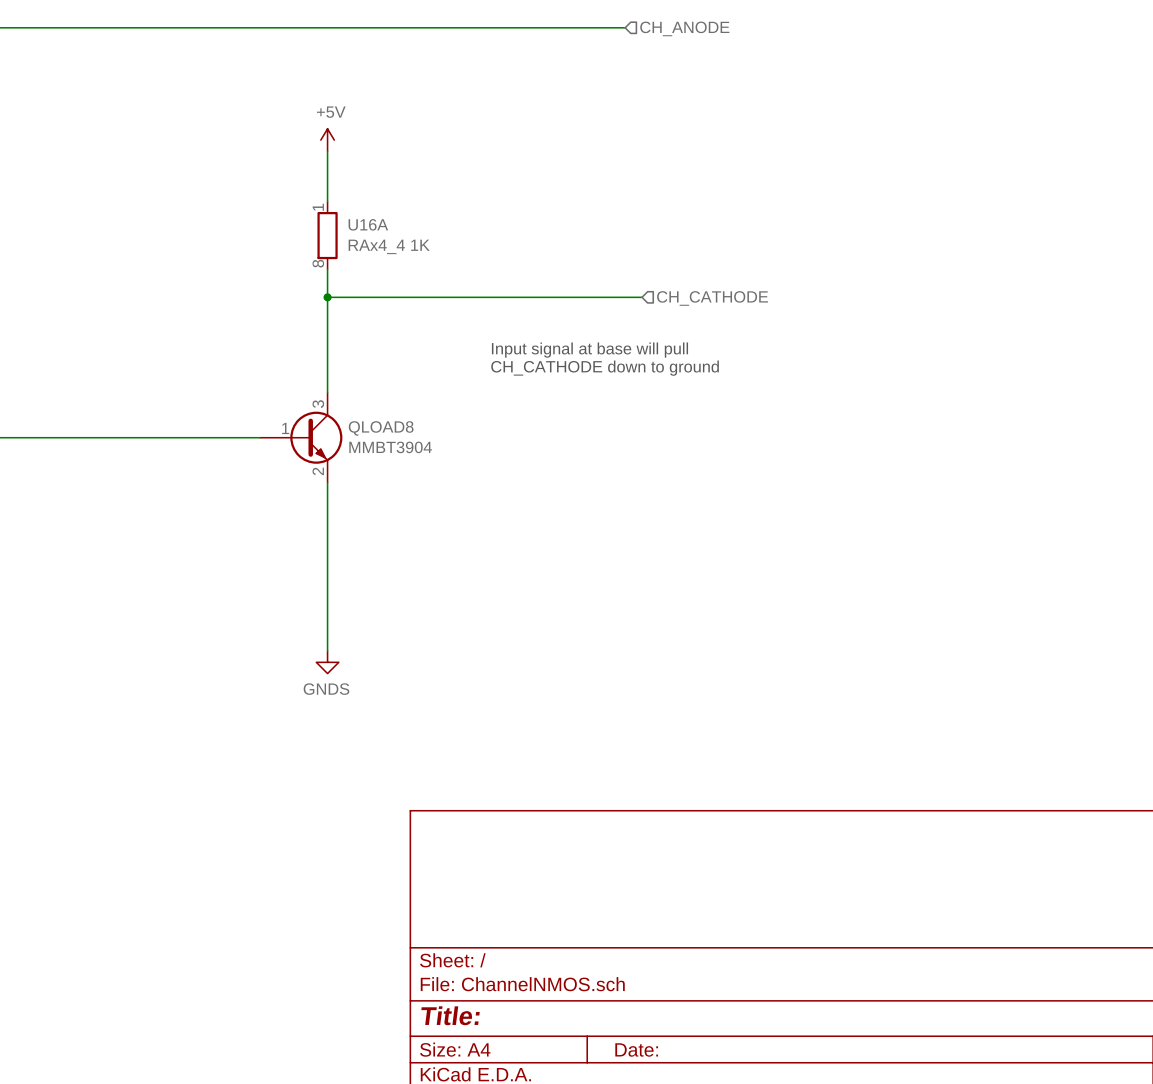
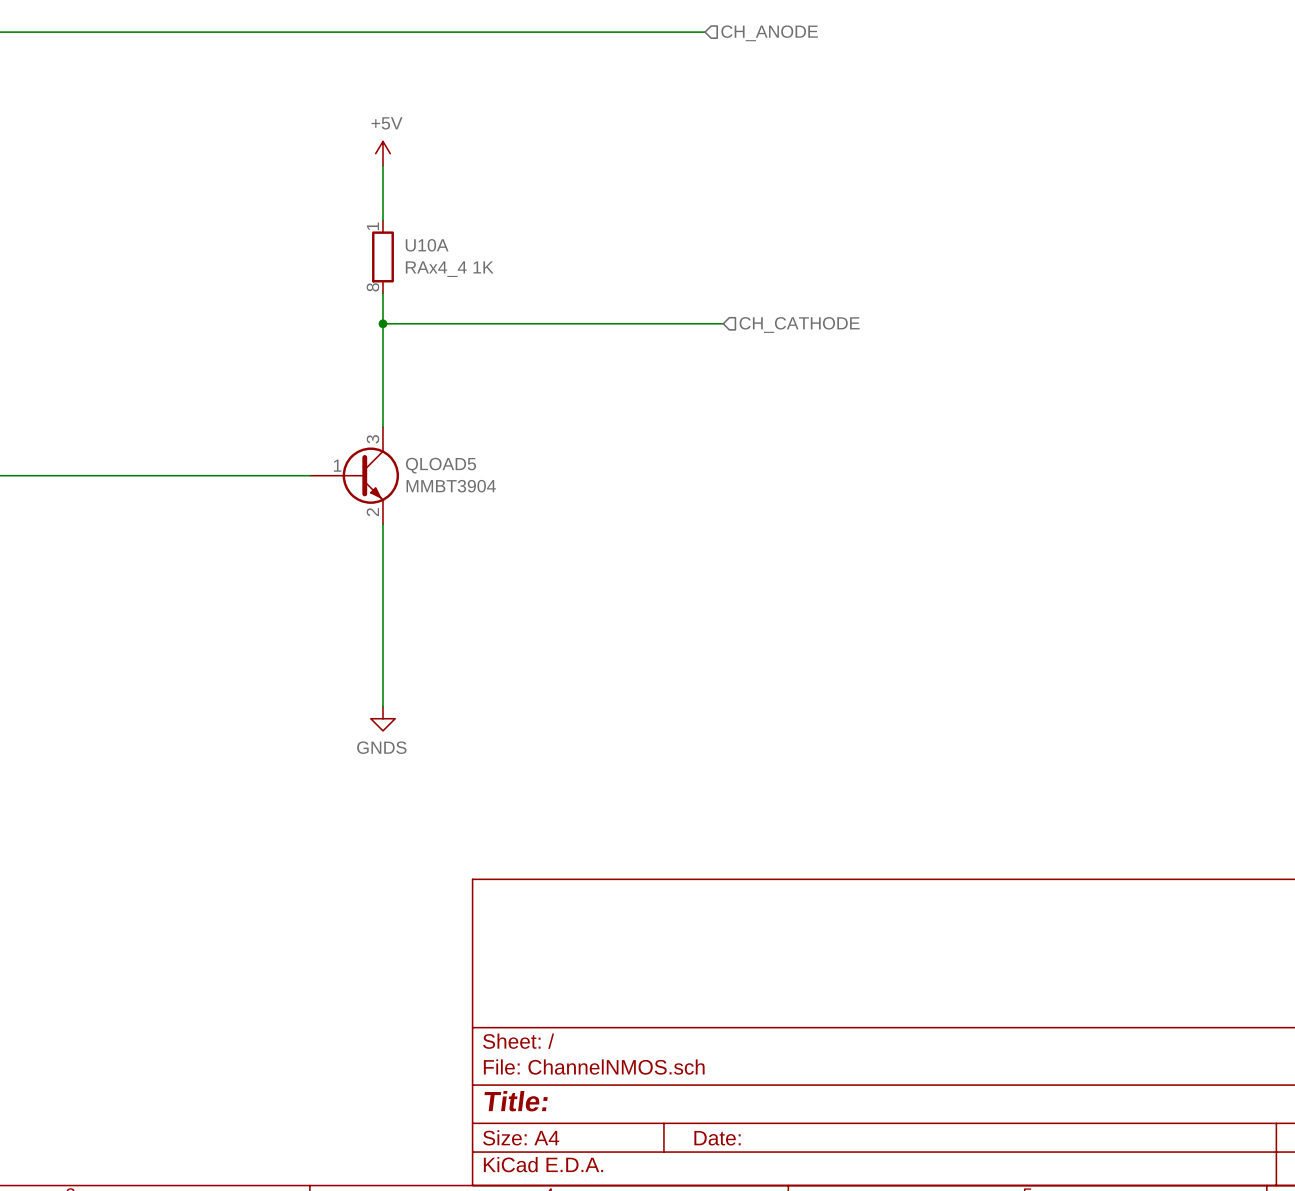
U16A name: U16A (368, 224) -> U10A (427, 245)
text: Input signal at base will pull (589, 350) -> none
text: CH_CATHODE down to ground (605, 368) -> none
QLOAD8 name: QLOAD8 (381, 428) -> QLOAD5 (440, 465)

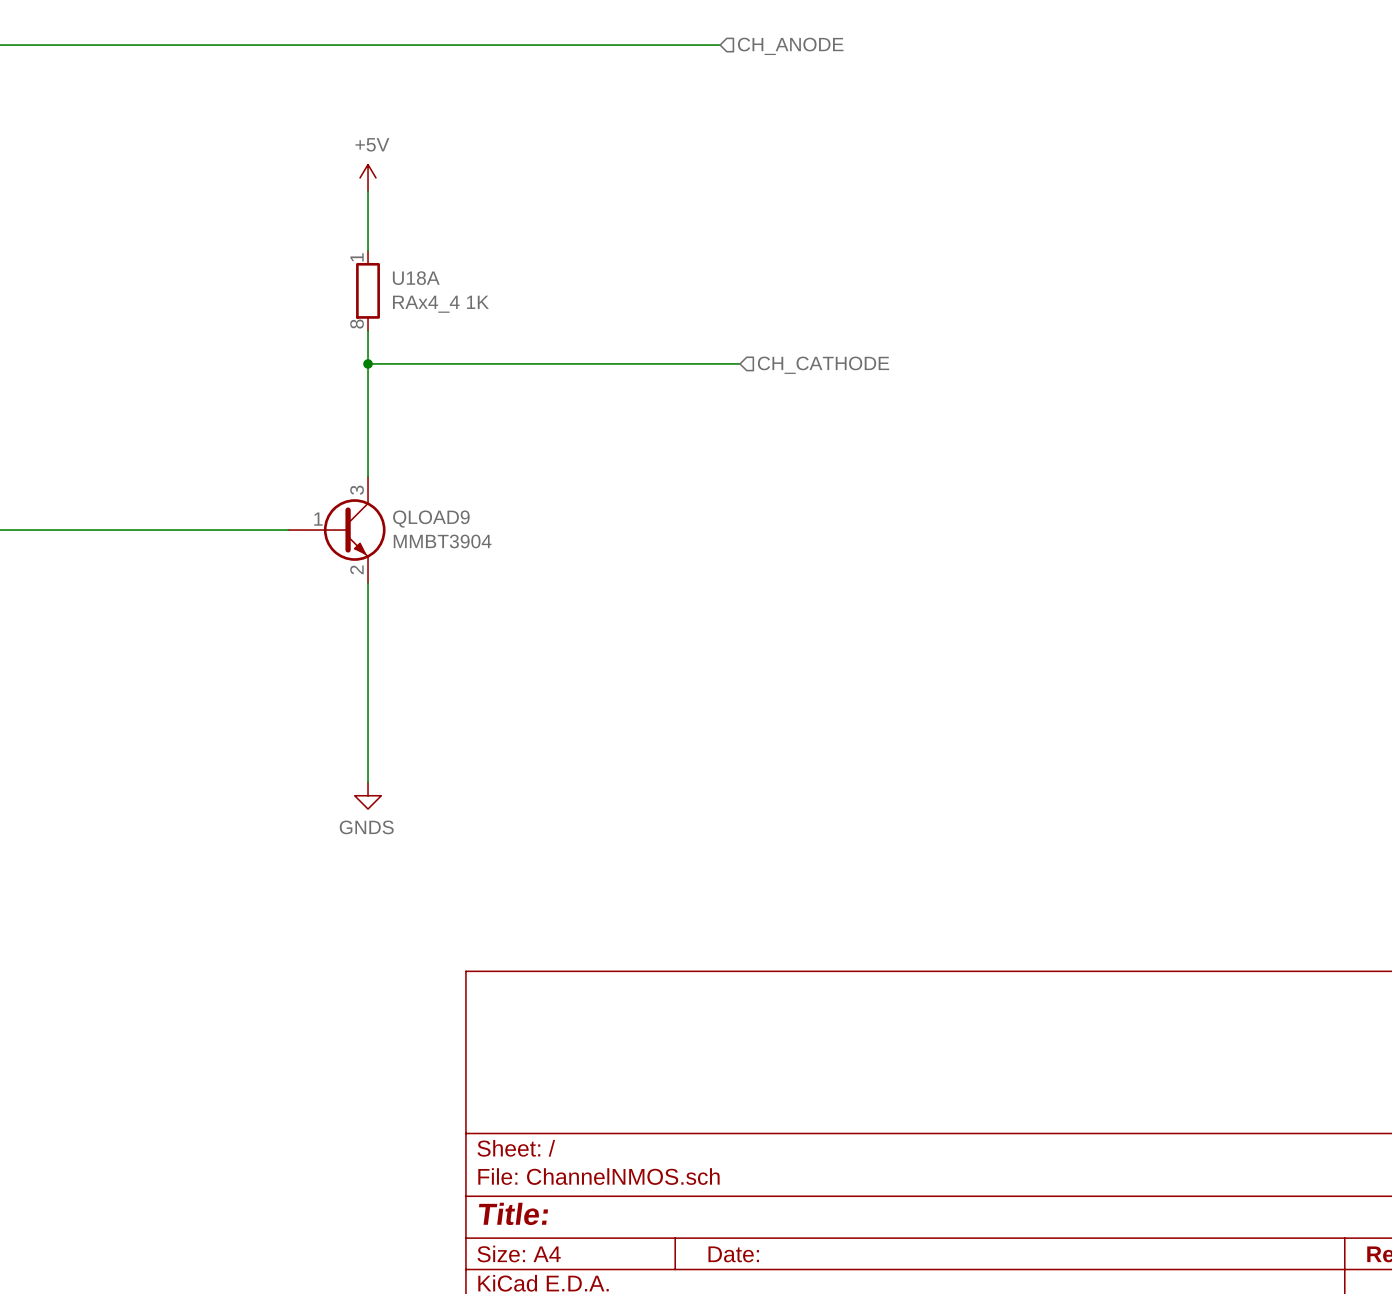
U10A name: U10A (427, 245) -> U18A (416, 278)
QLOAD5 name: QLOAD5 (440, 465) -> QLOAD9 (431, 519)

